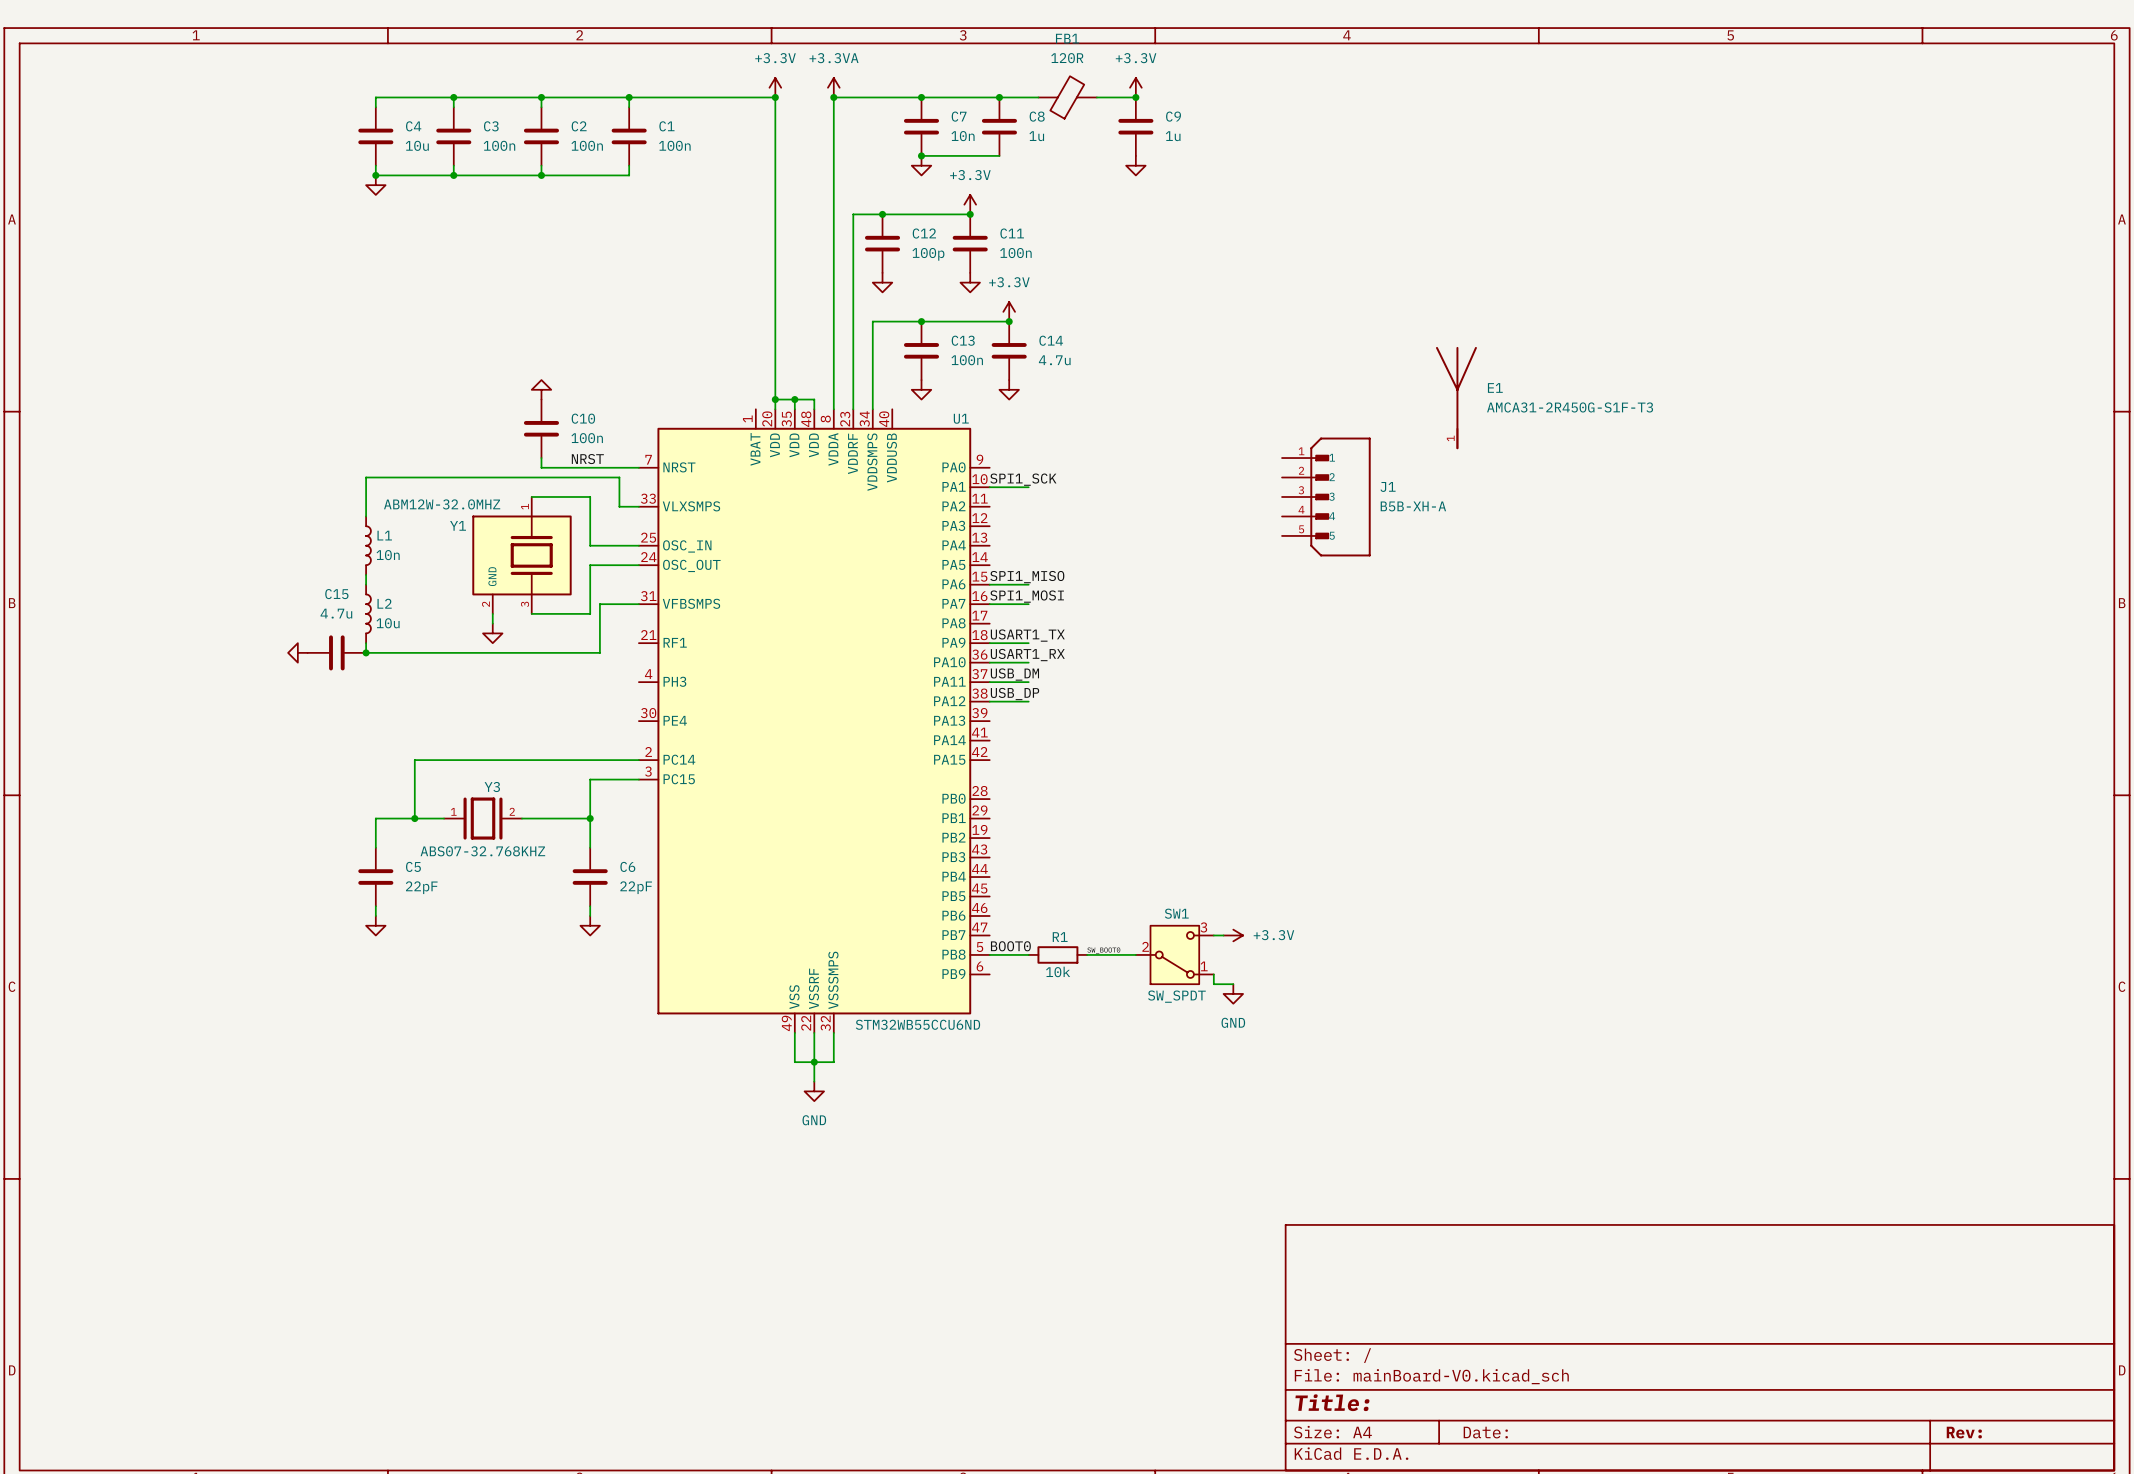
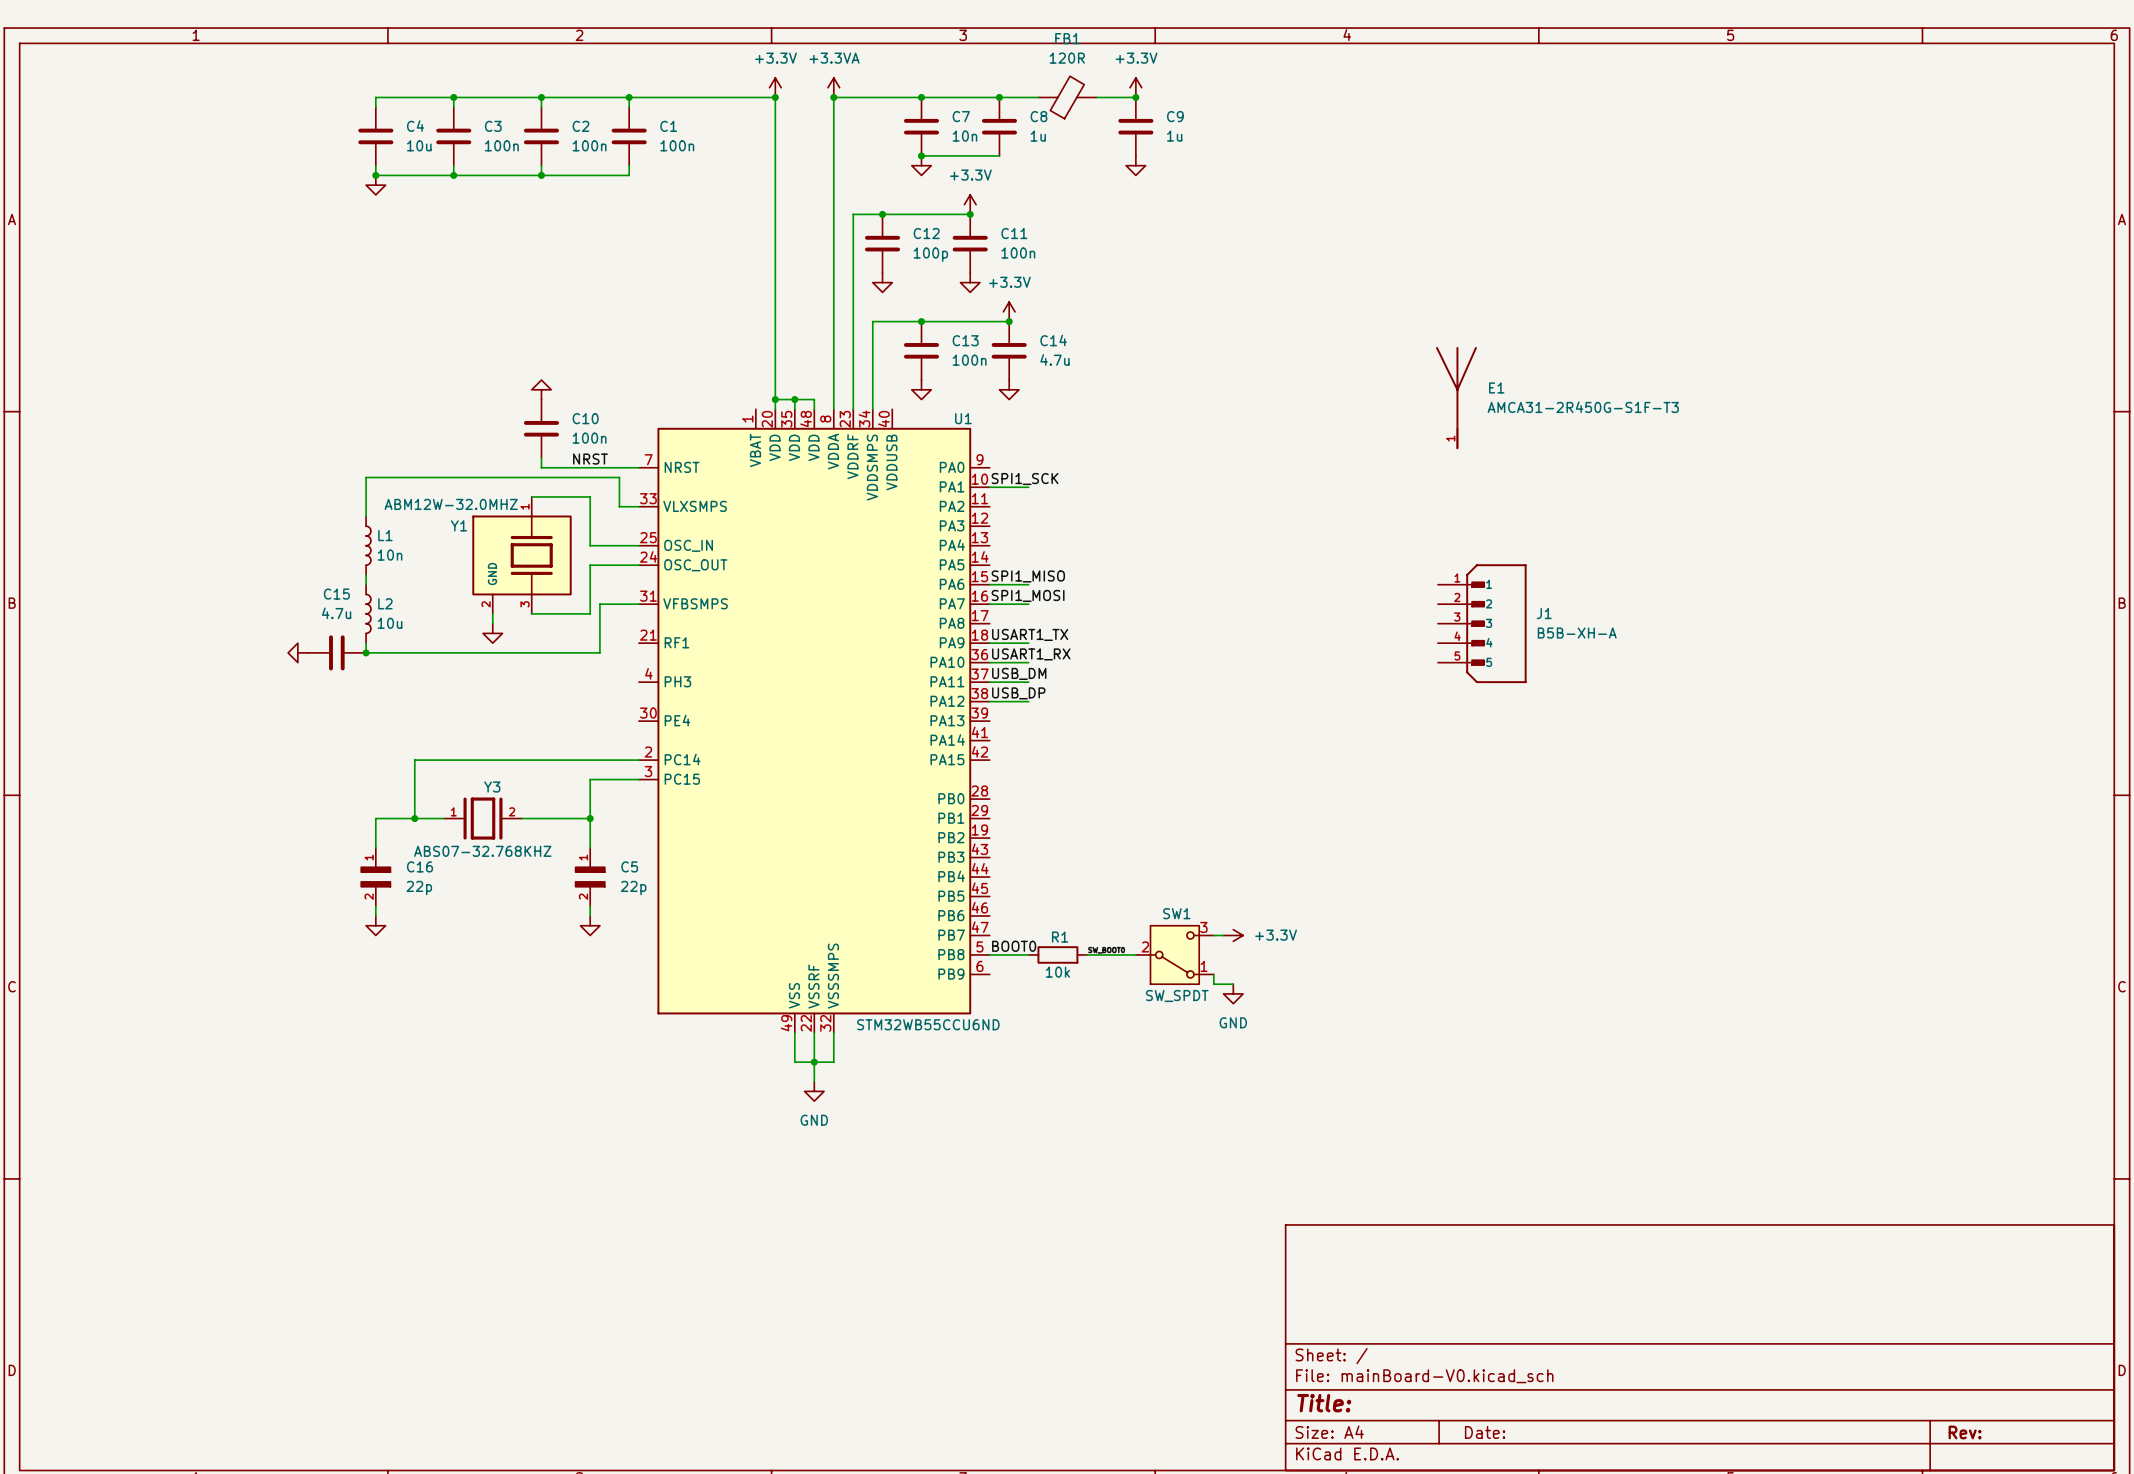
J1 position: (1326, 496) -> (1482, 623)
C5 symbol: [358, 847, 394, 907] -> [575, 847, 606, 907]
C16: none -> 22p (375, 877)
C6: 22pF (590, 877) -> none
C5 value: 22pF (421, 887) -> 22p (633, 888)

